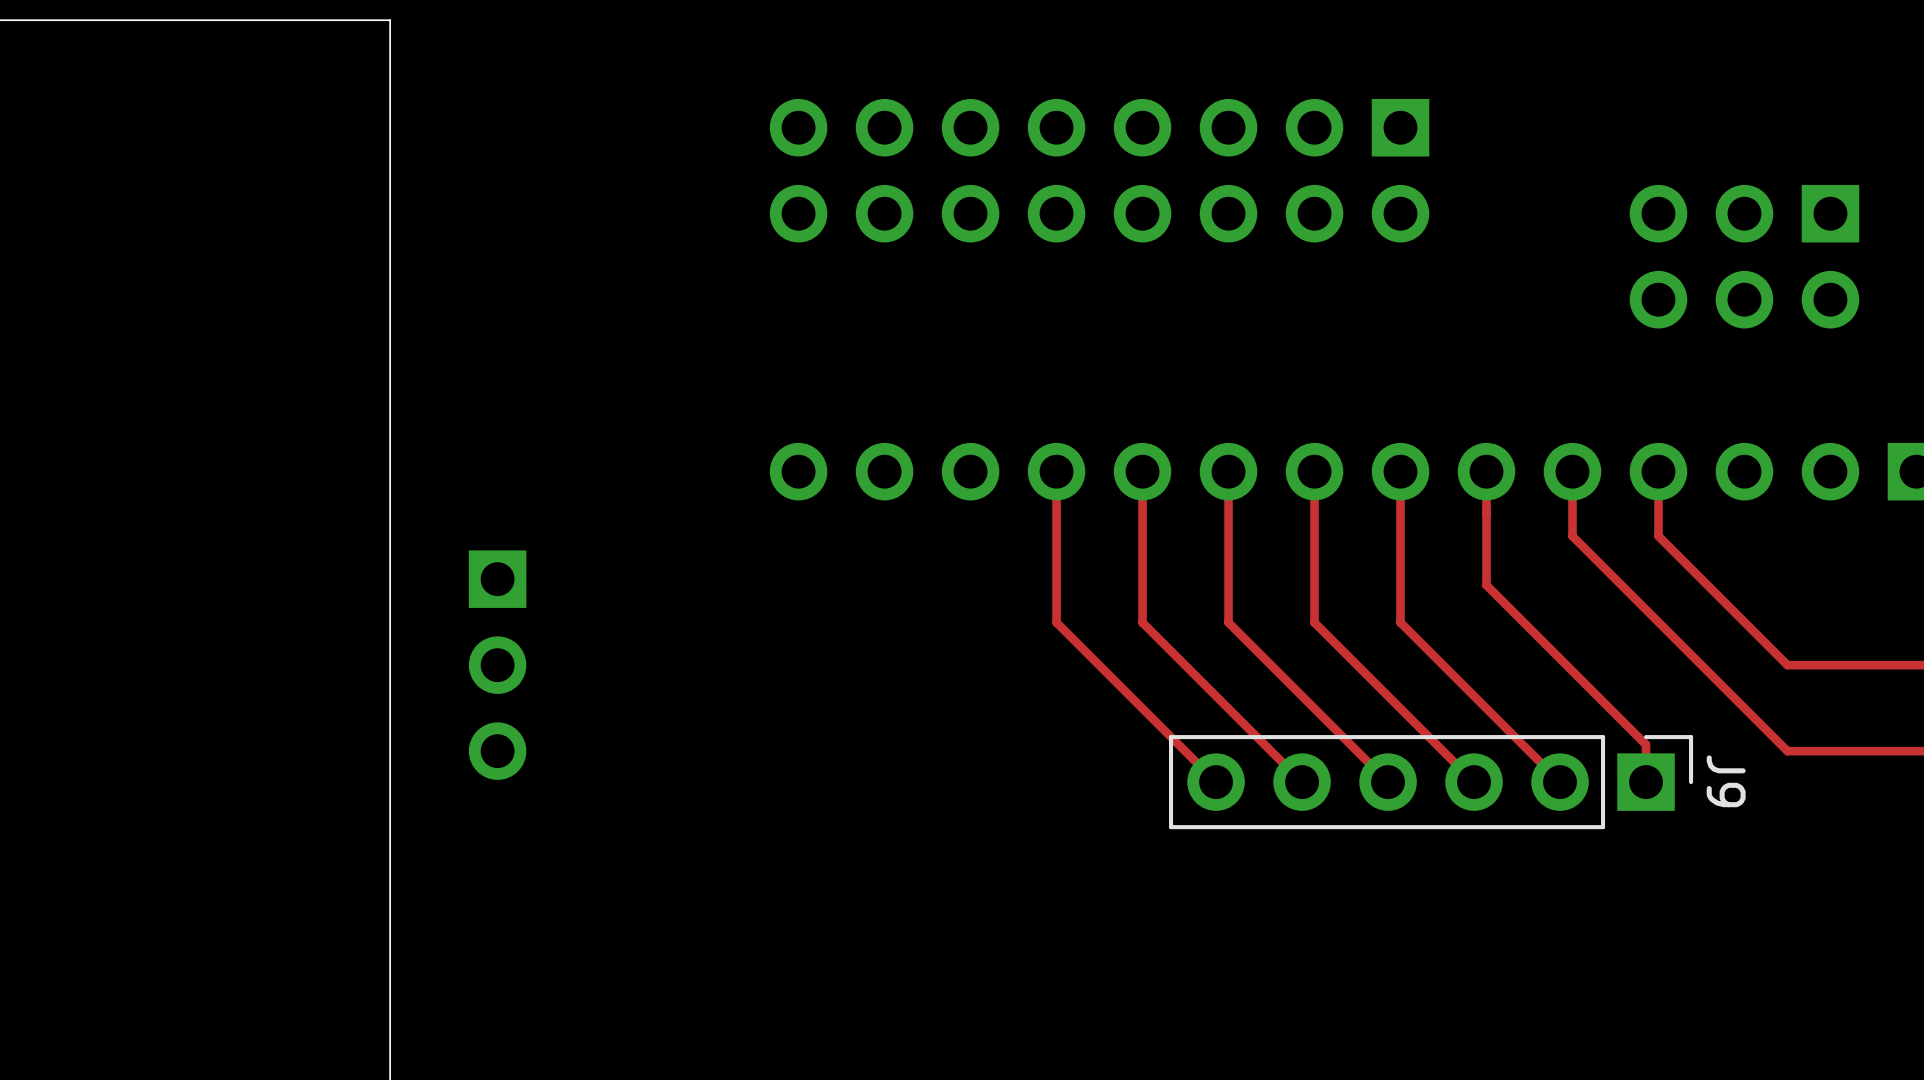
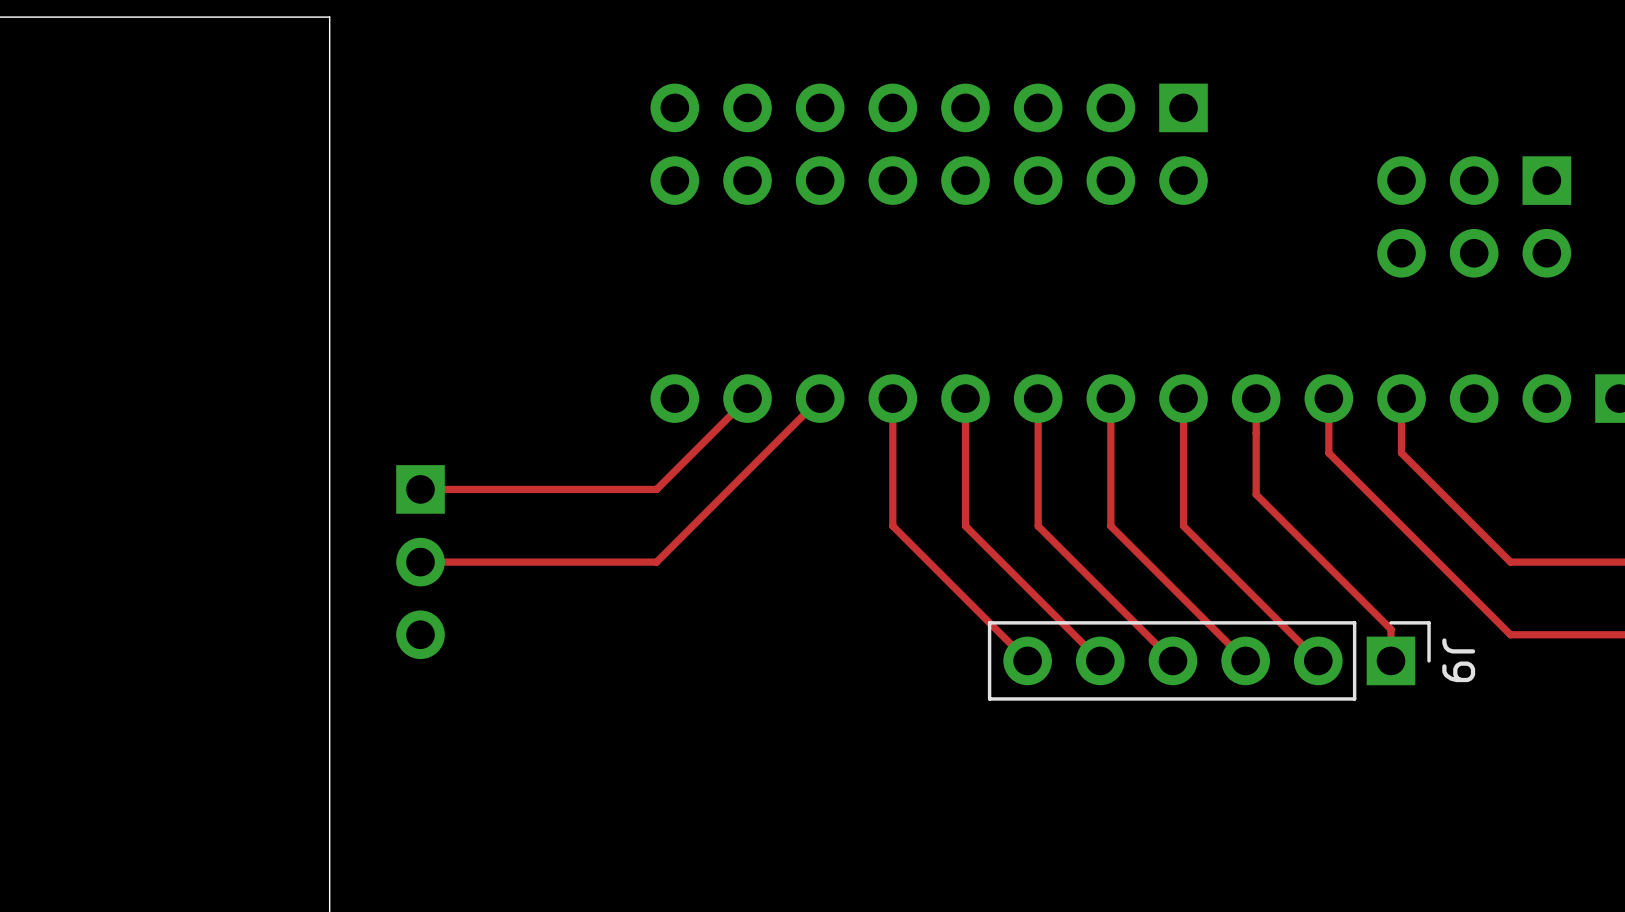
top track: none -> (747, 398) (656, 489) (420, 489)
top track: none -> (820, 398) (656, 562) (420, 562)

